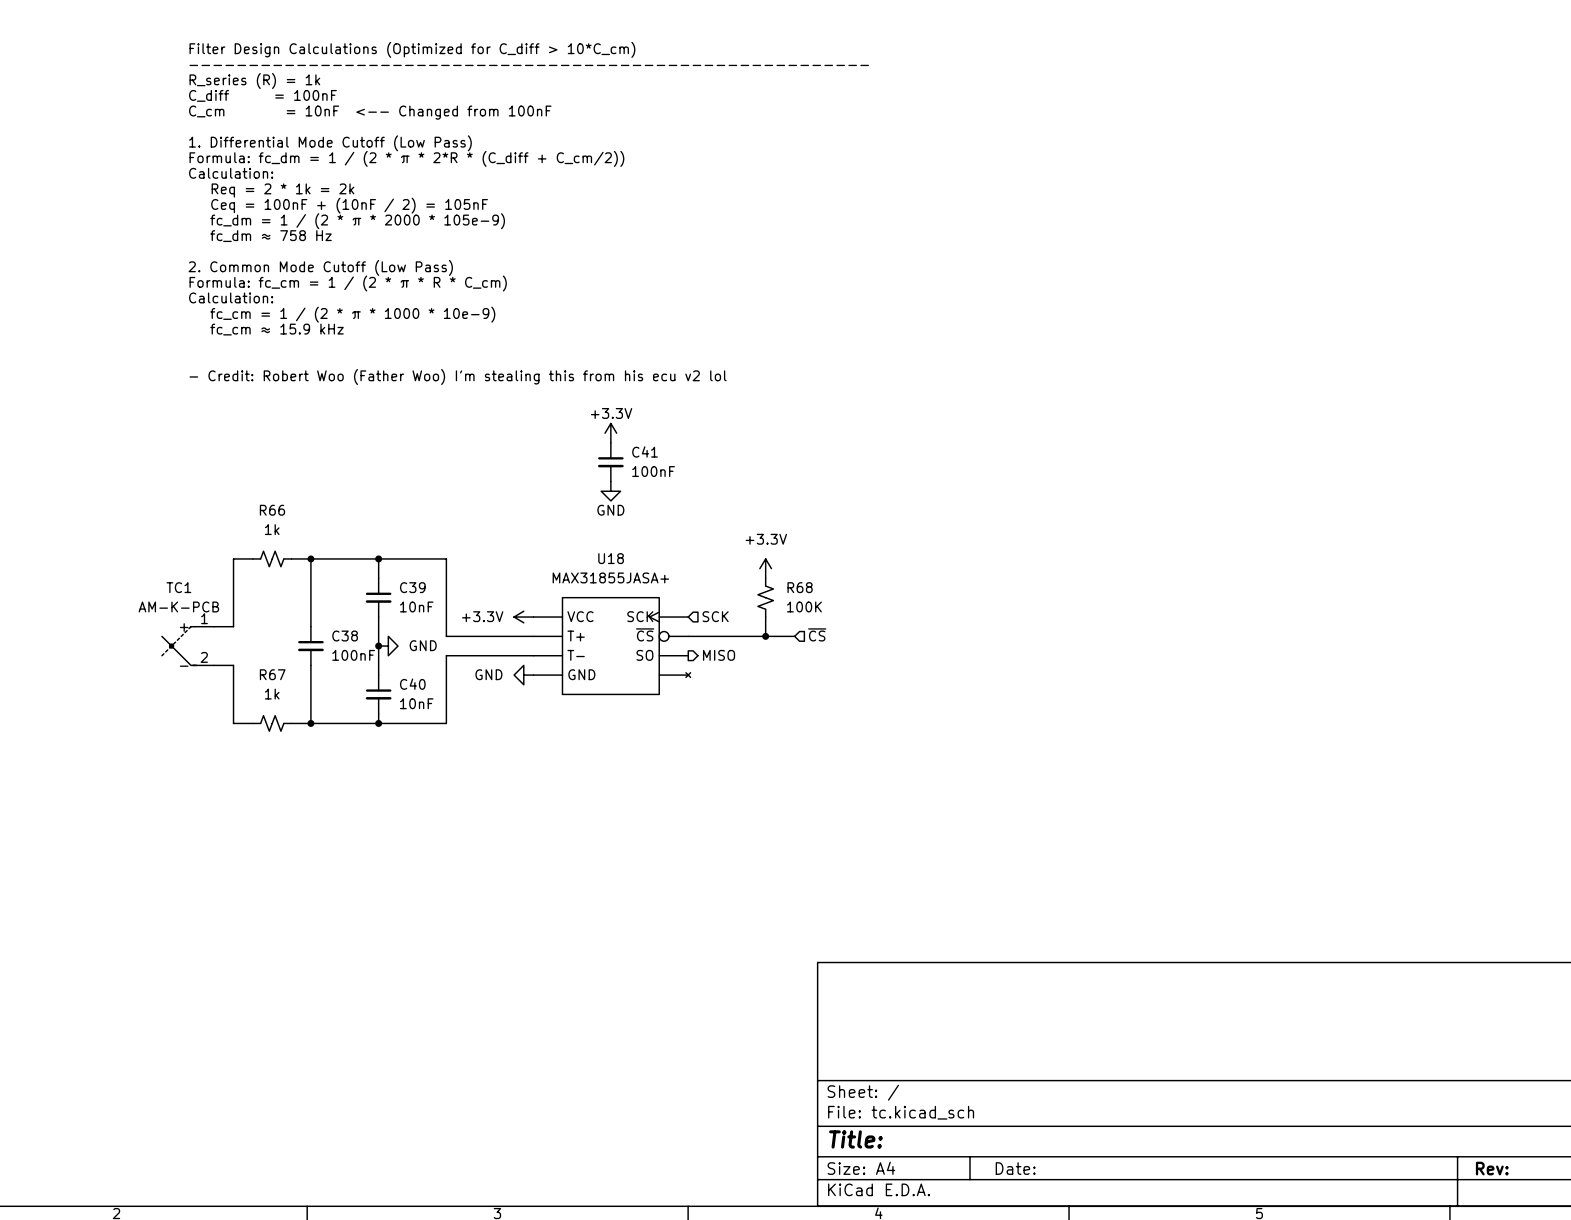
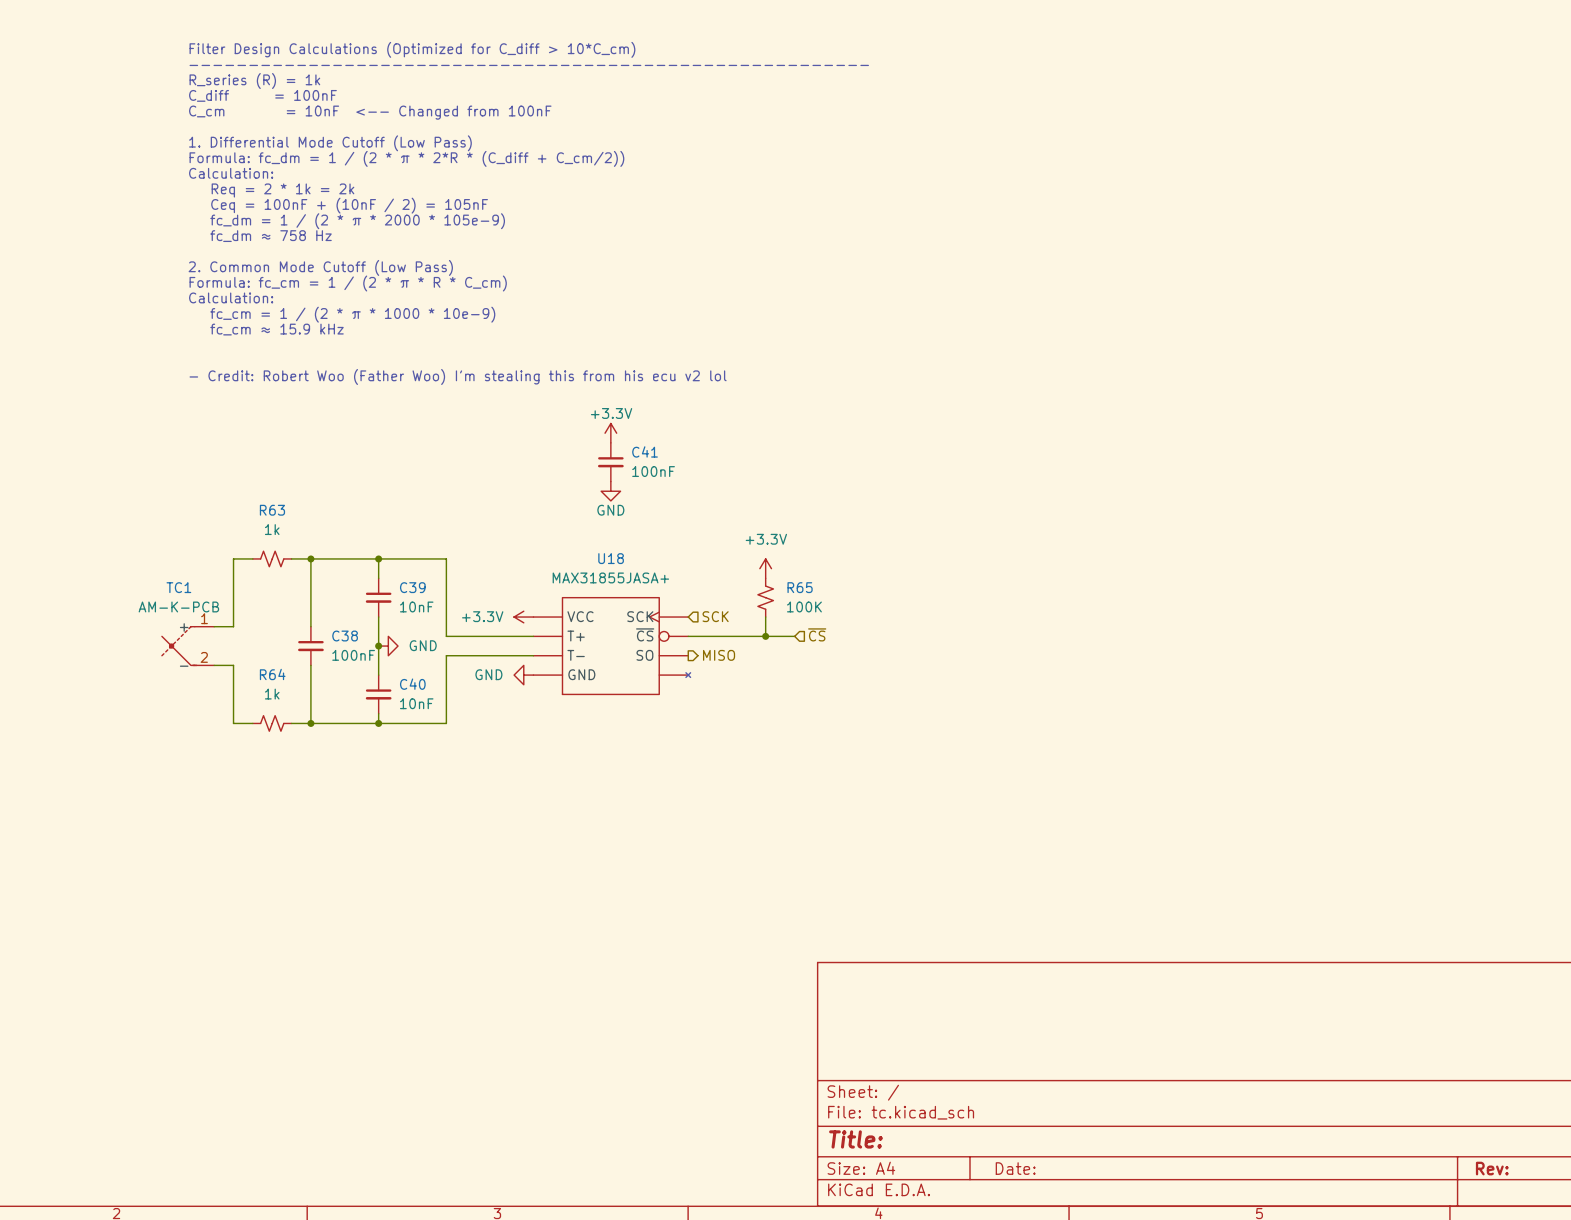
R66 name: R66 (272, 510) -> R63 (272, 510)
R68 name: R68 (800, 587) -> R65 (800, 587)
R67 name: R67 (272, 674) -> R64 (272, 674)

